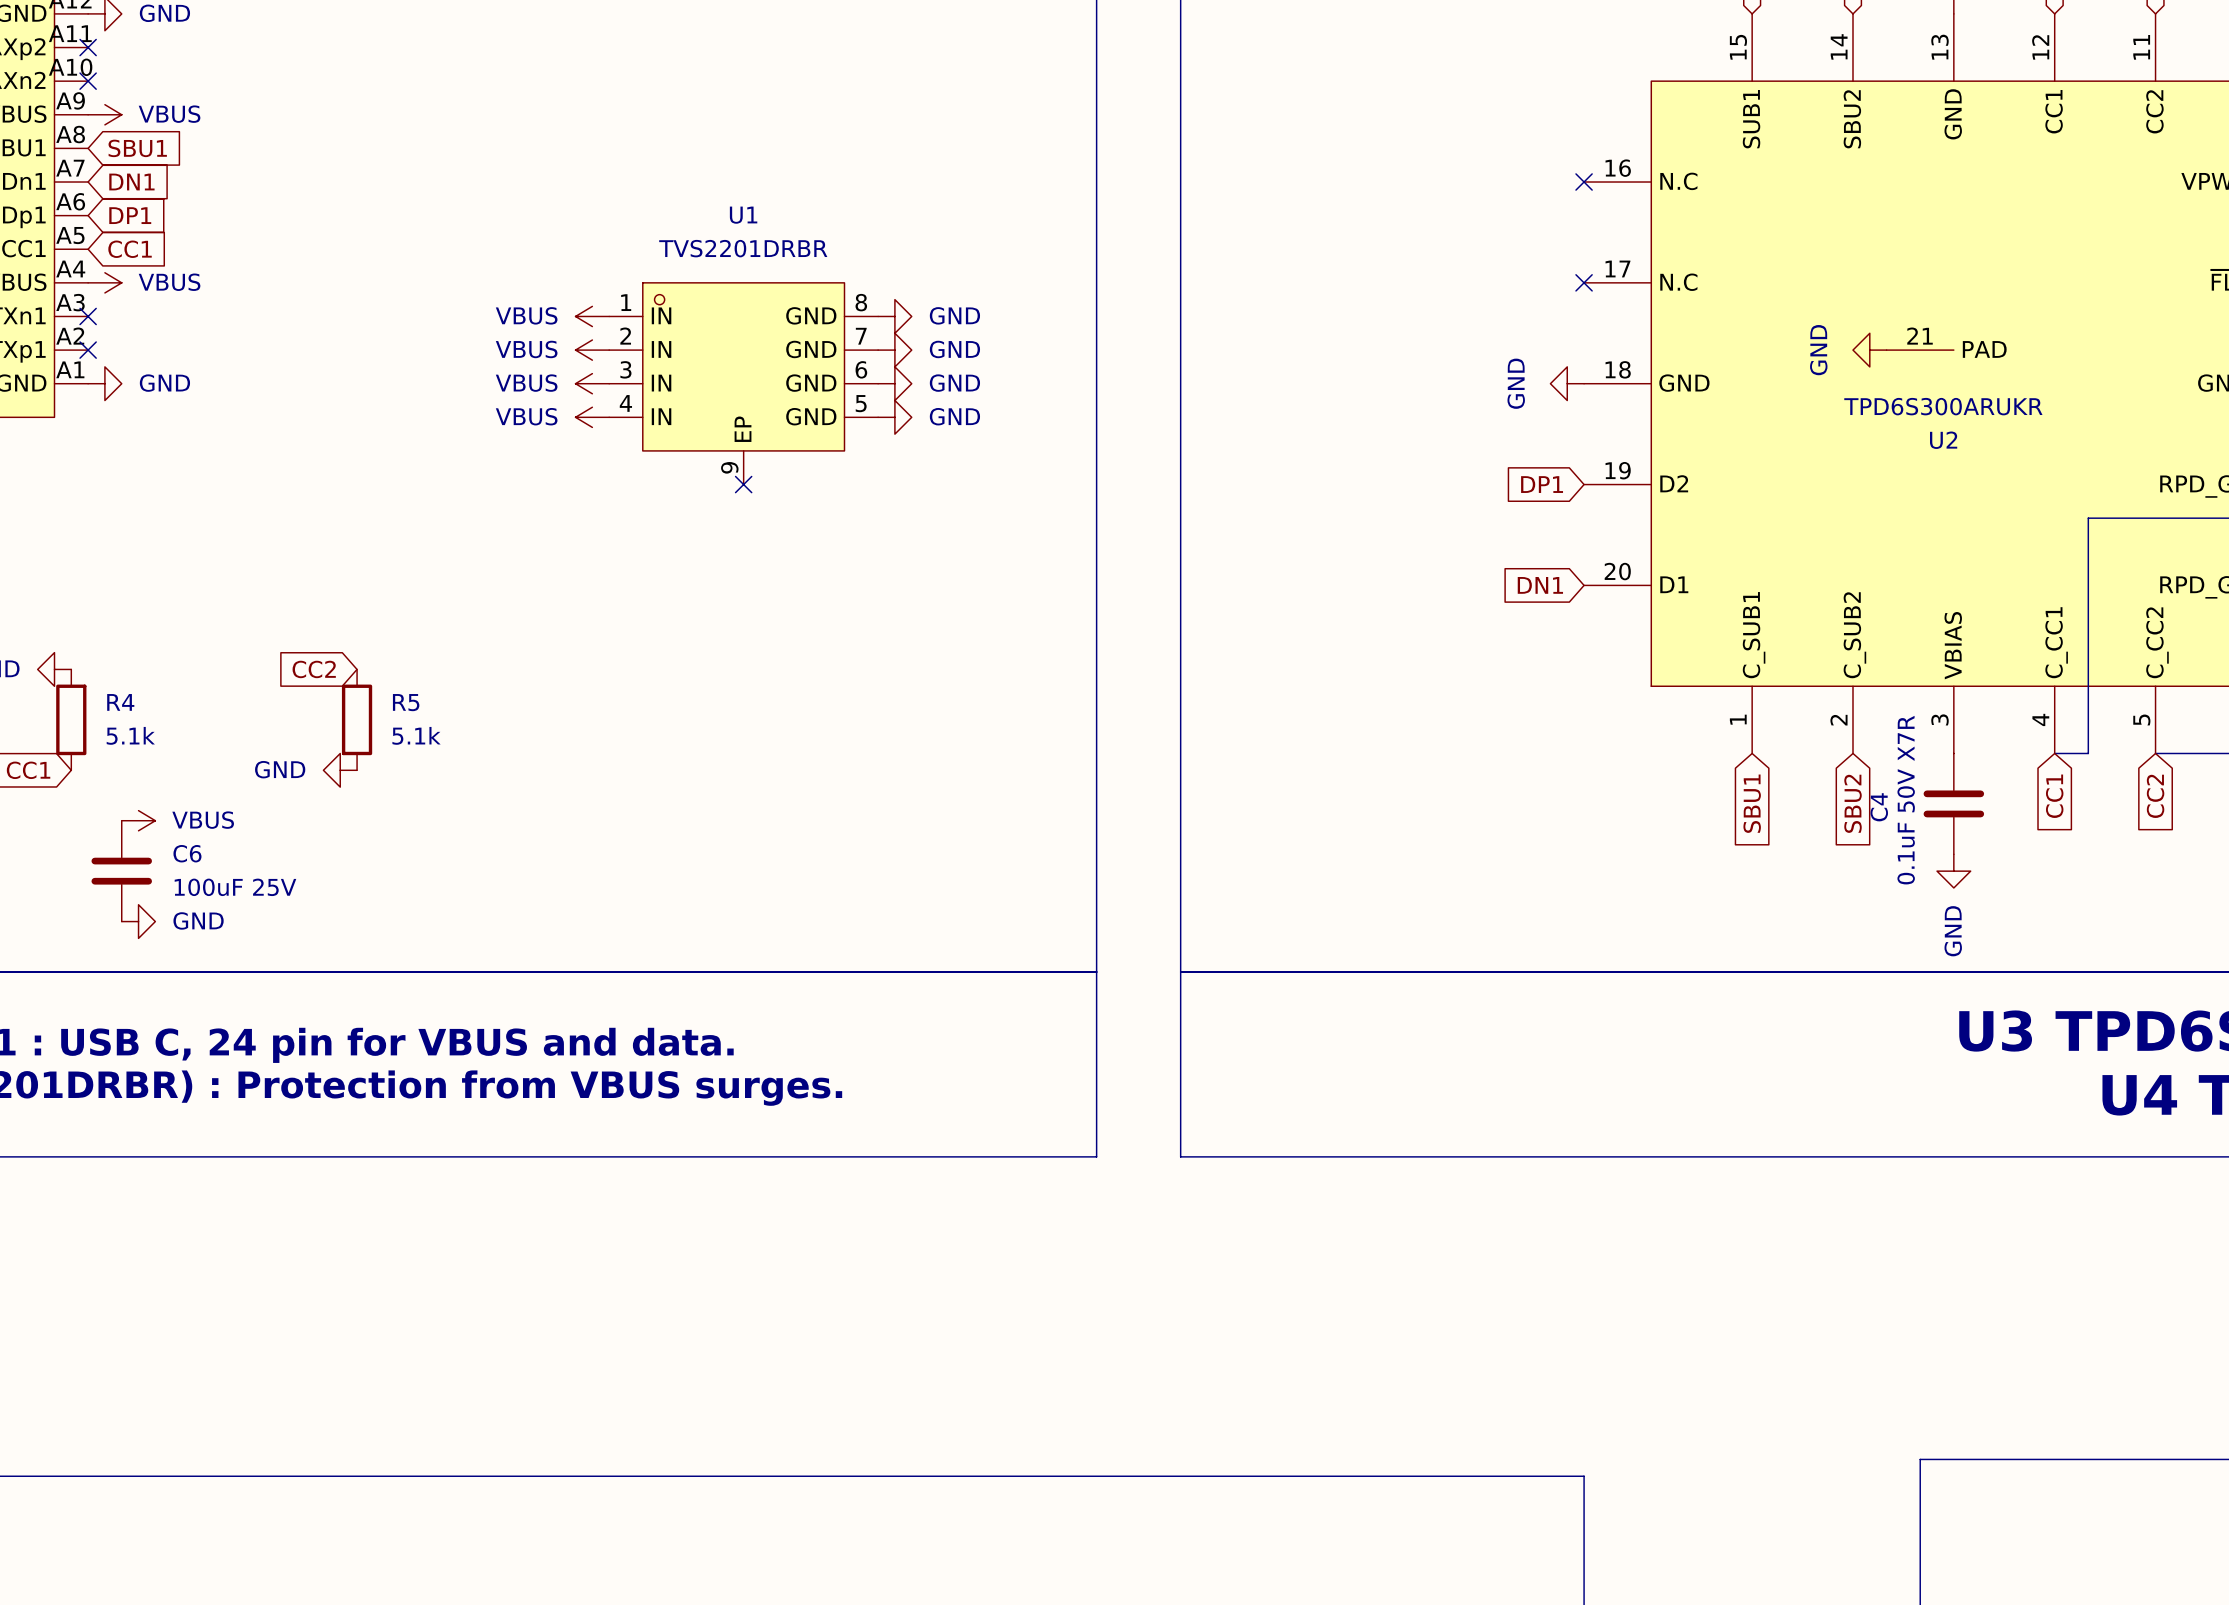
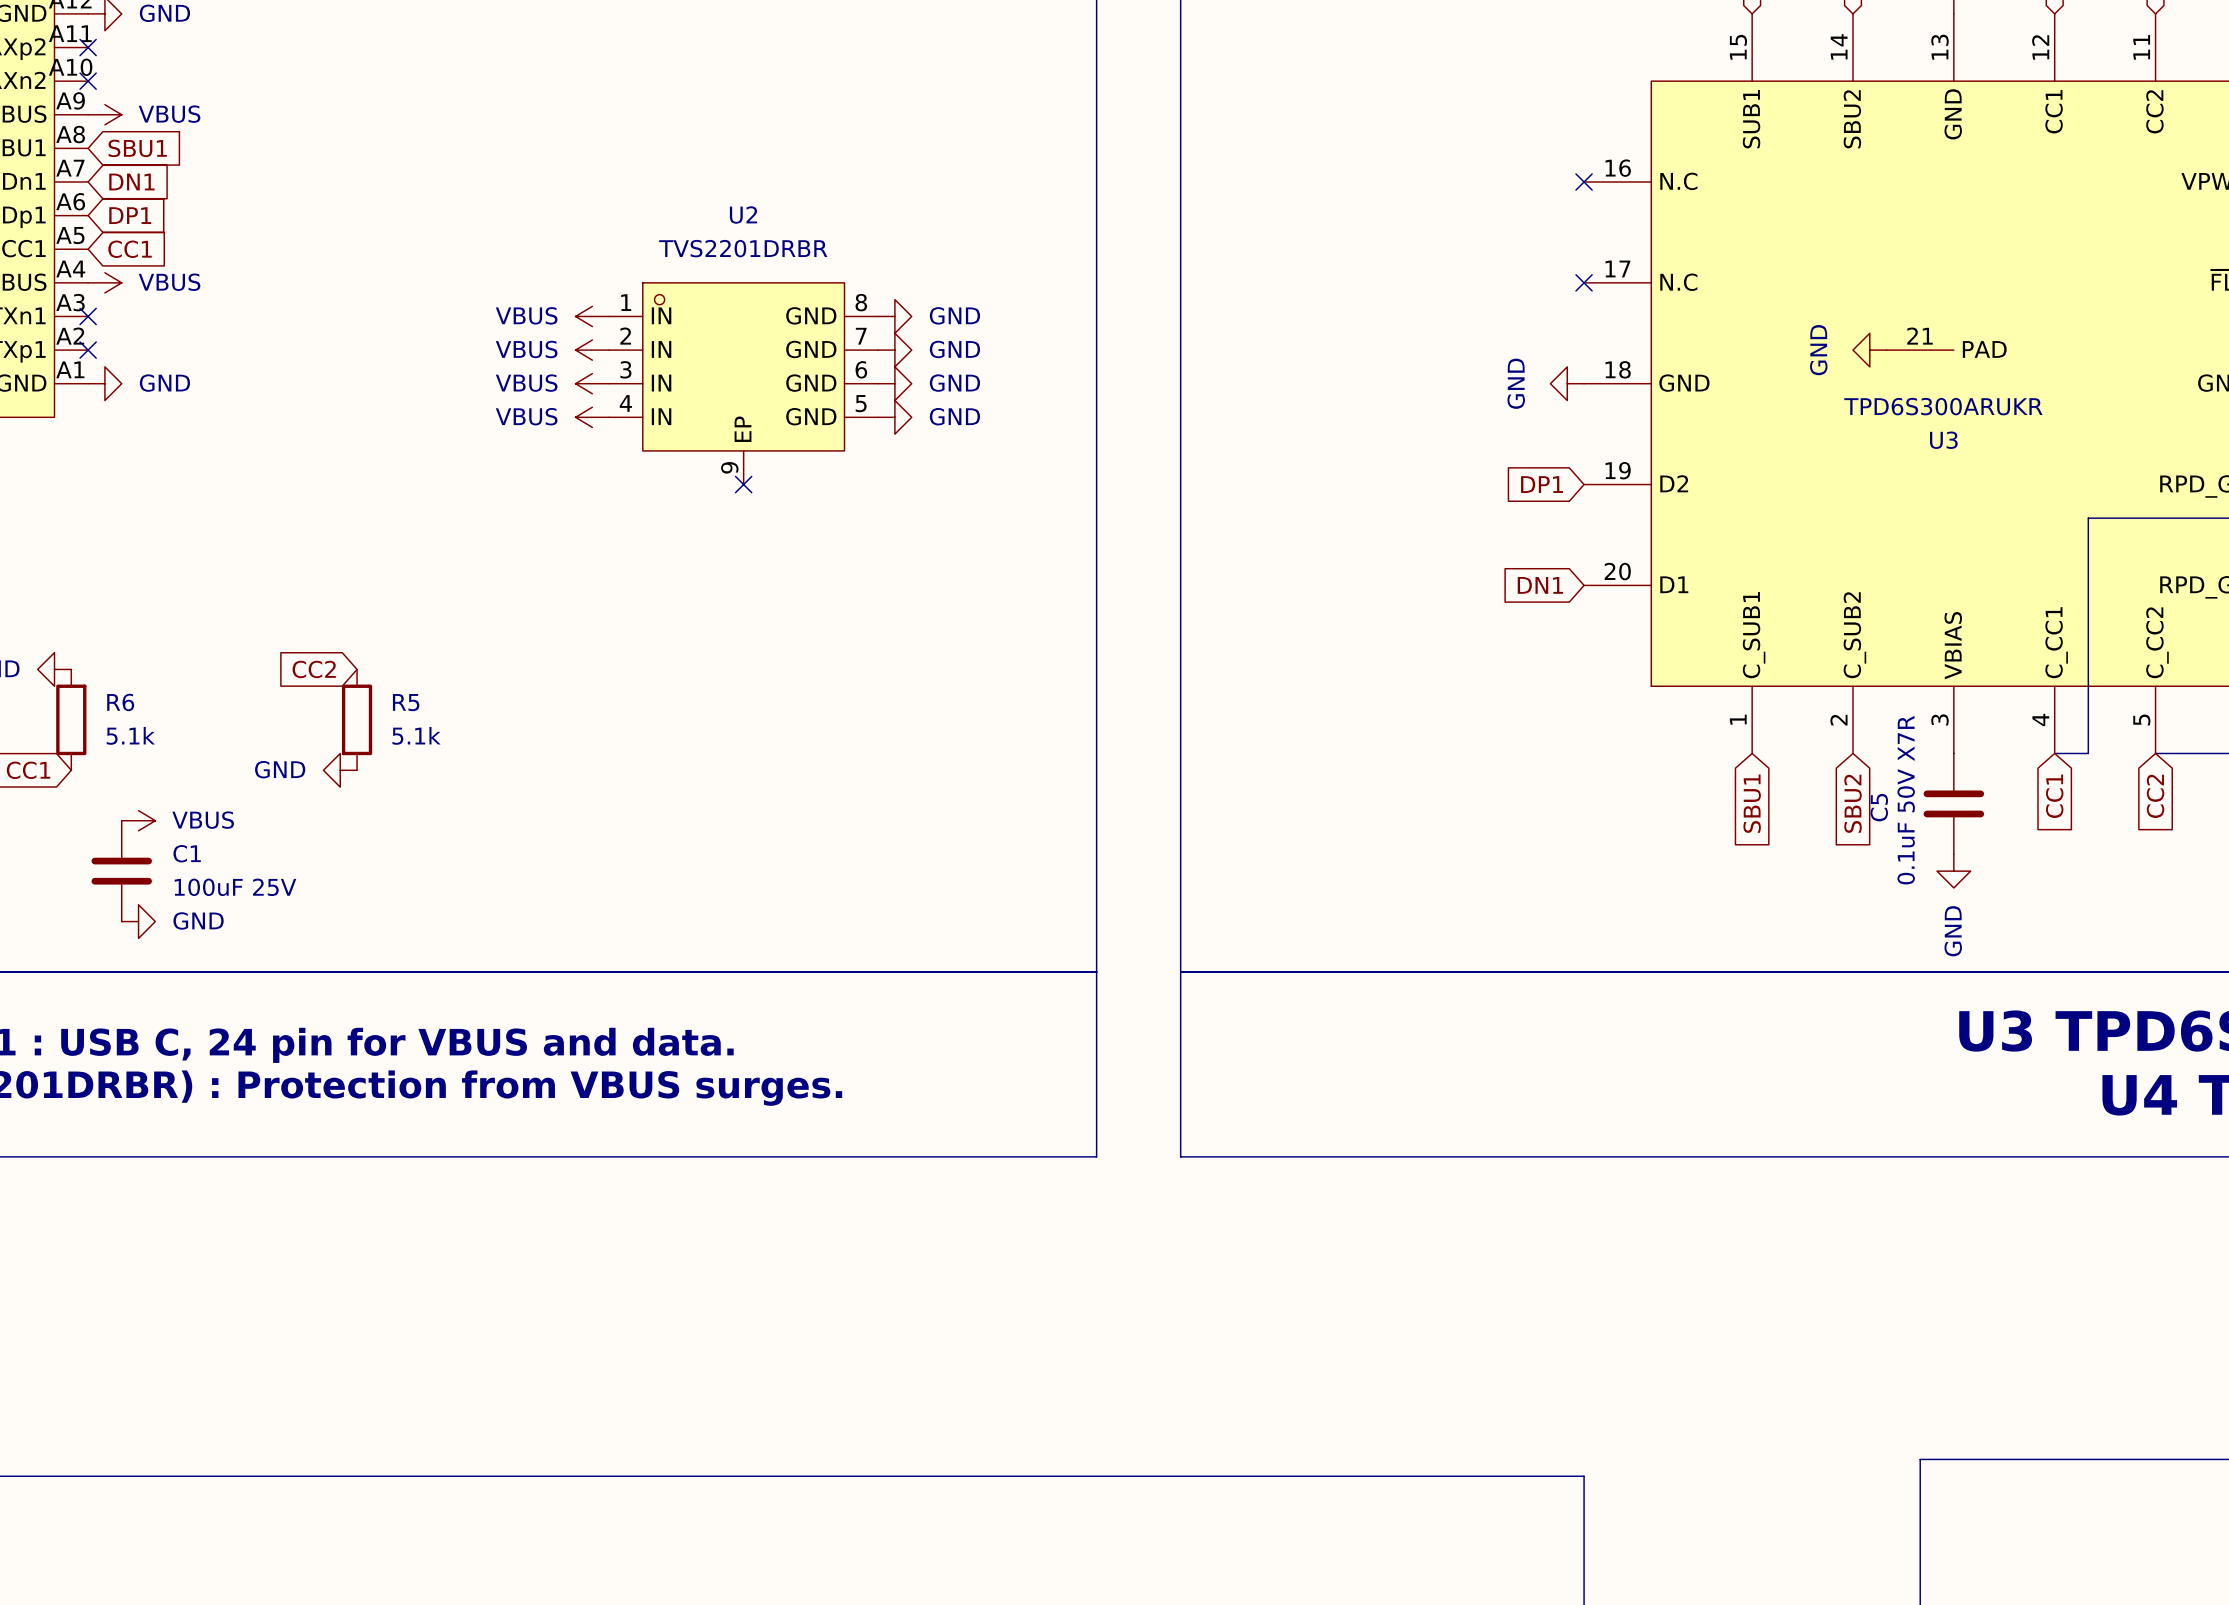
U1 name: U1 (743, 215) -> U2 (743, 215)
U2 name: U2 (1943, 440) -> U3 (1943, 440)
R4 name: R4 (120, 702) -> R6 (120, 702)
C4 name: C4 (1879, 807) -> C5 (1879, 807)
C6 name: C6 (187, 853) -> C1 (187, 853)

